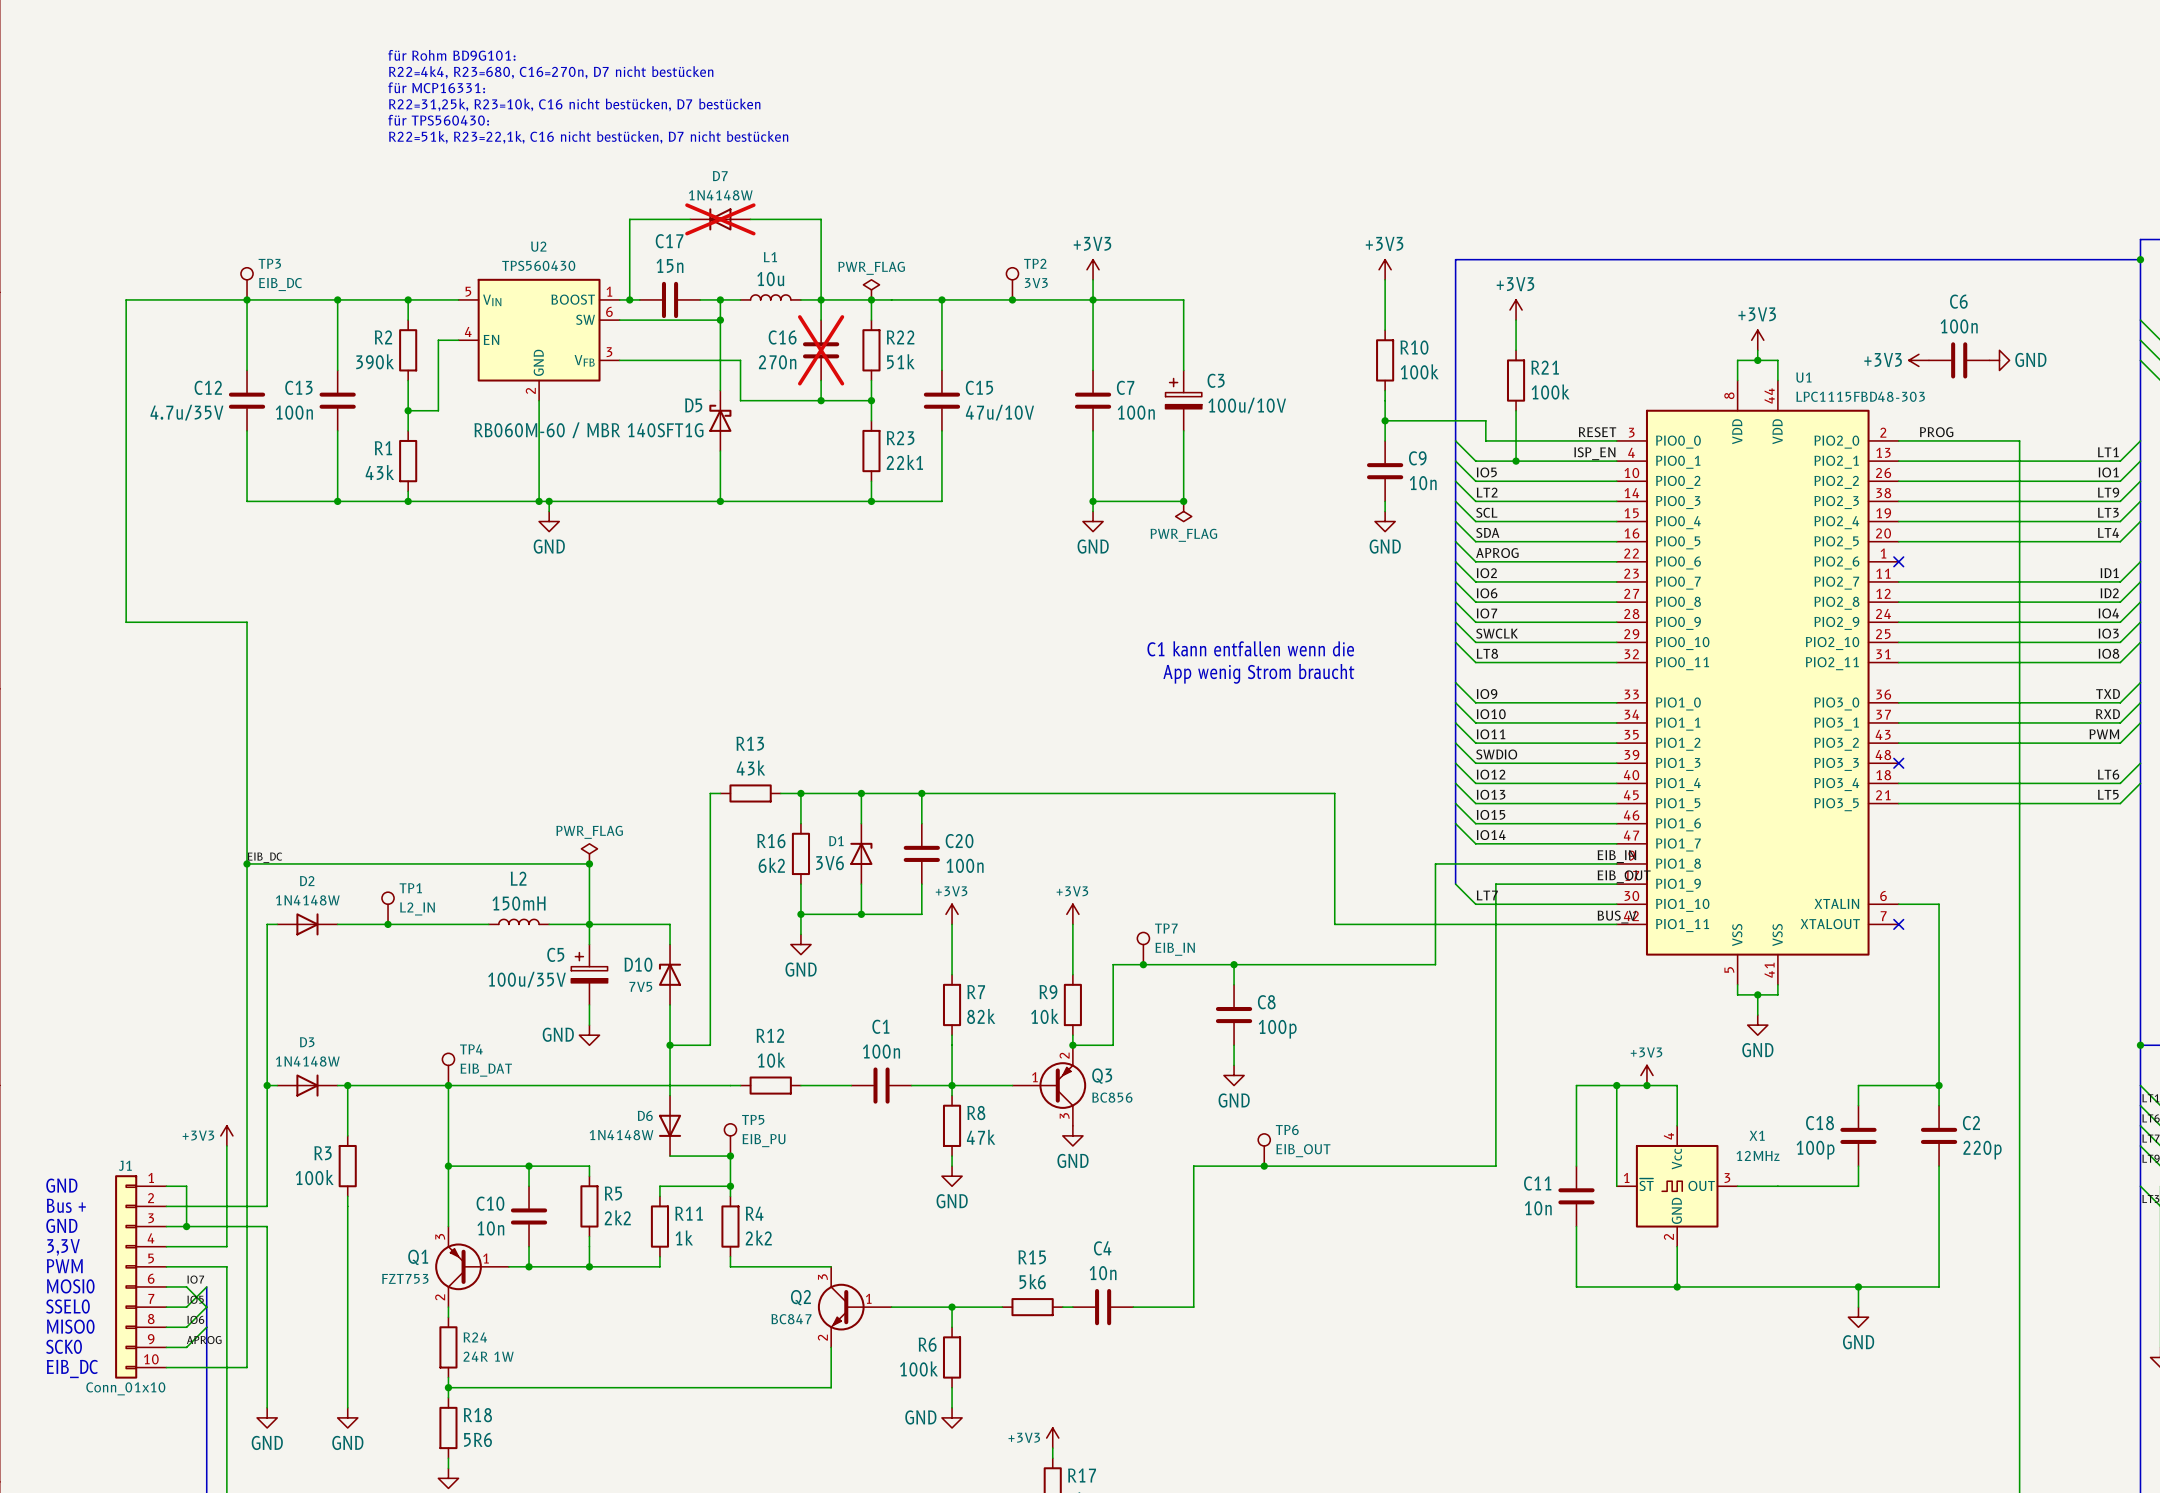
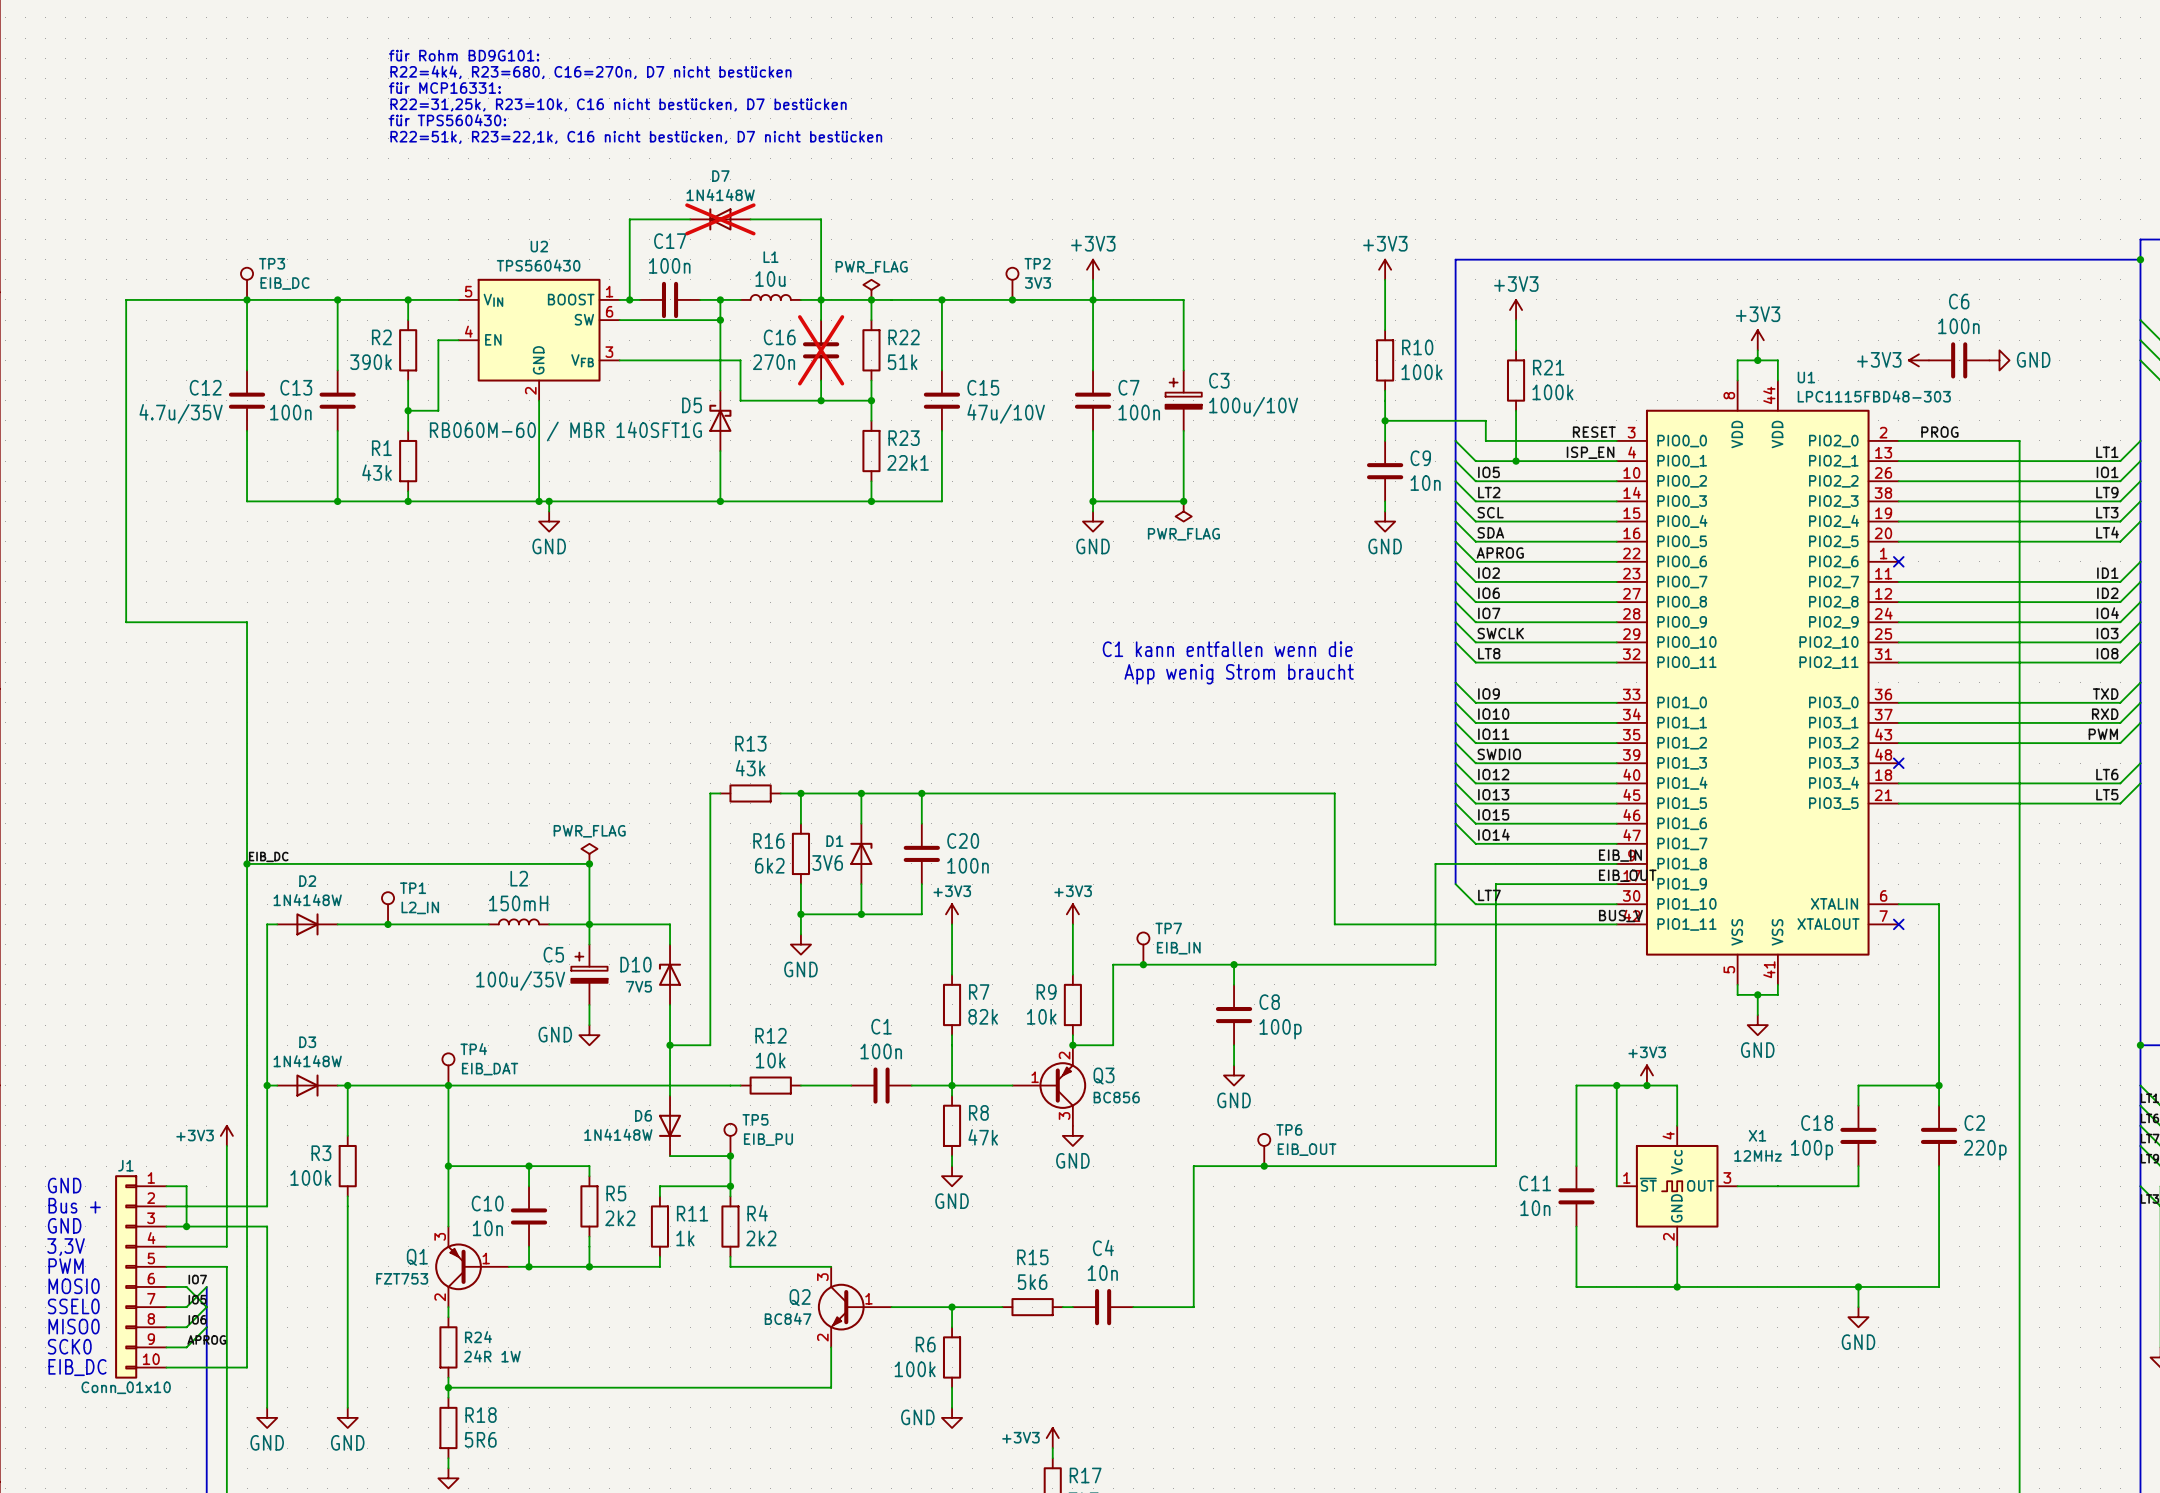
C17 value: 15n (670, 265) -> 100n (669, 265)

